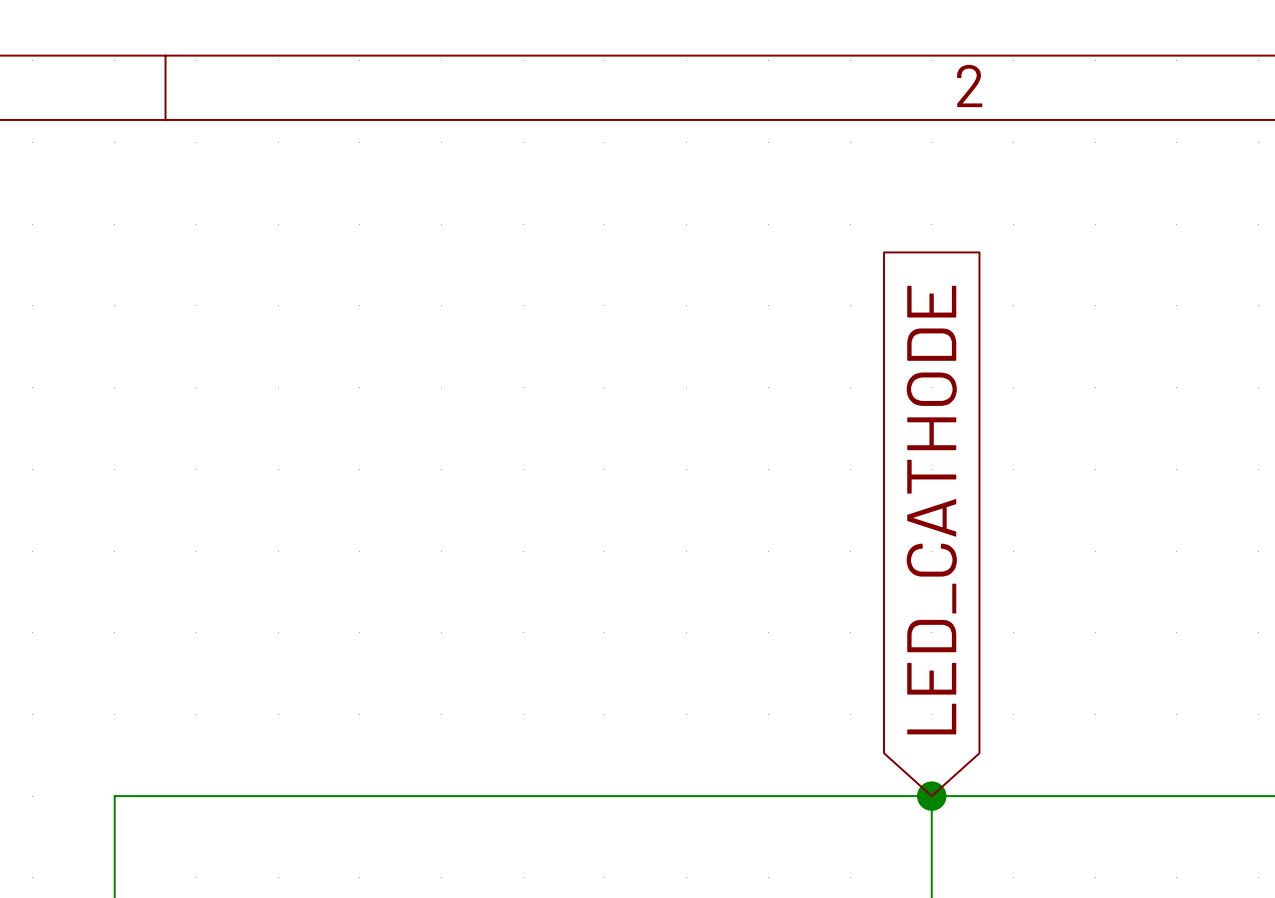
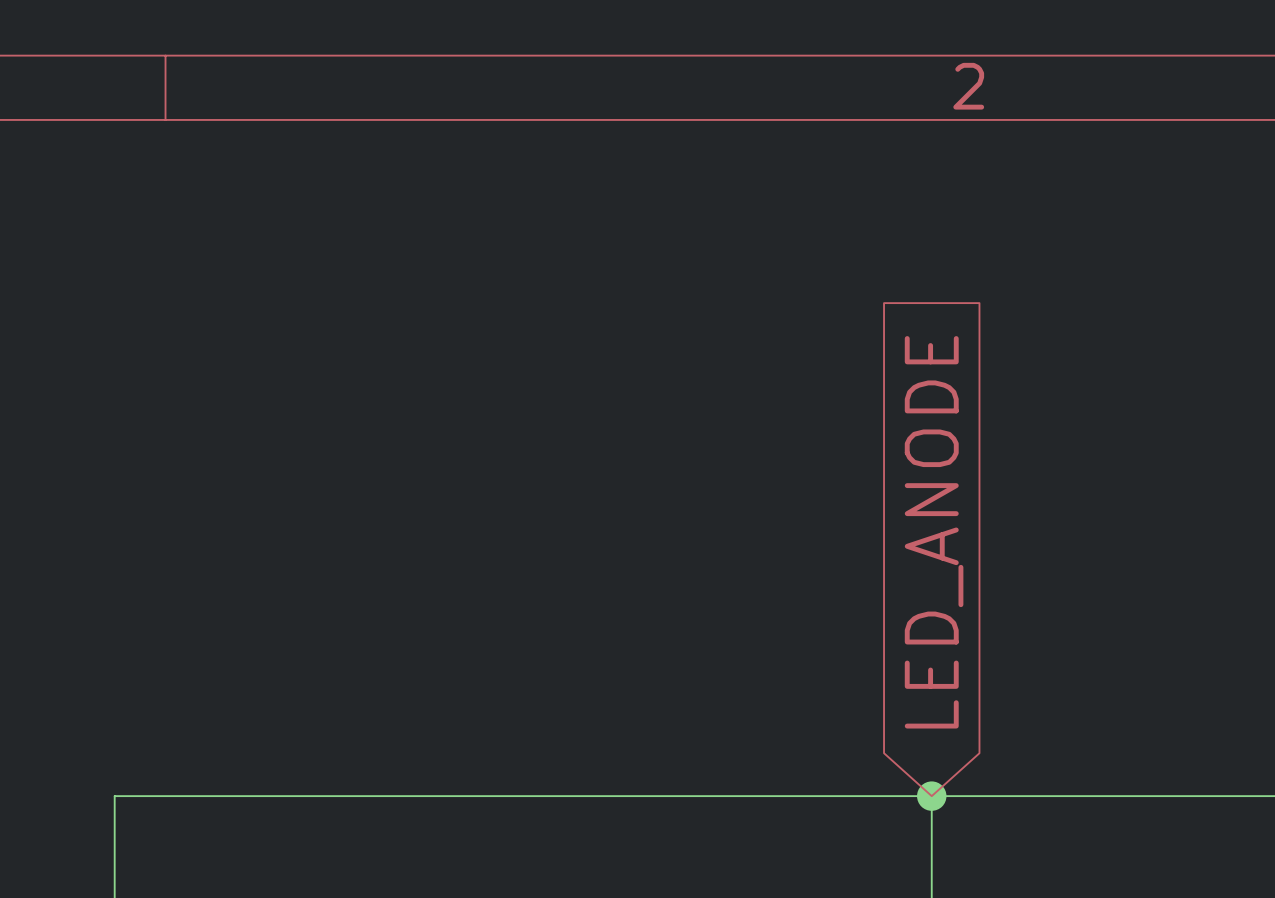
global label: LED_CATHODE (931, 510) -> LED_ANODE (934, 532)

